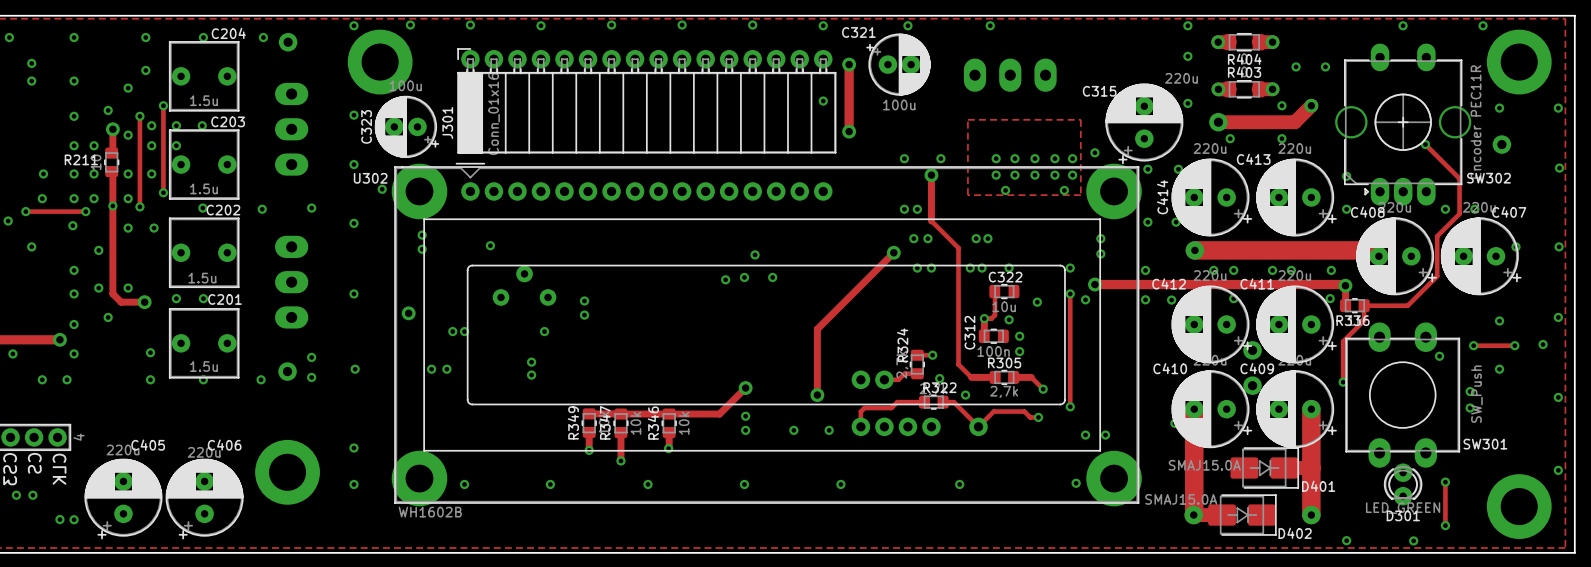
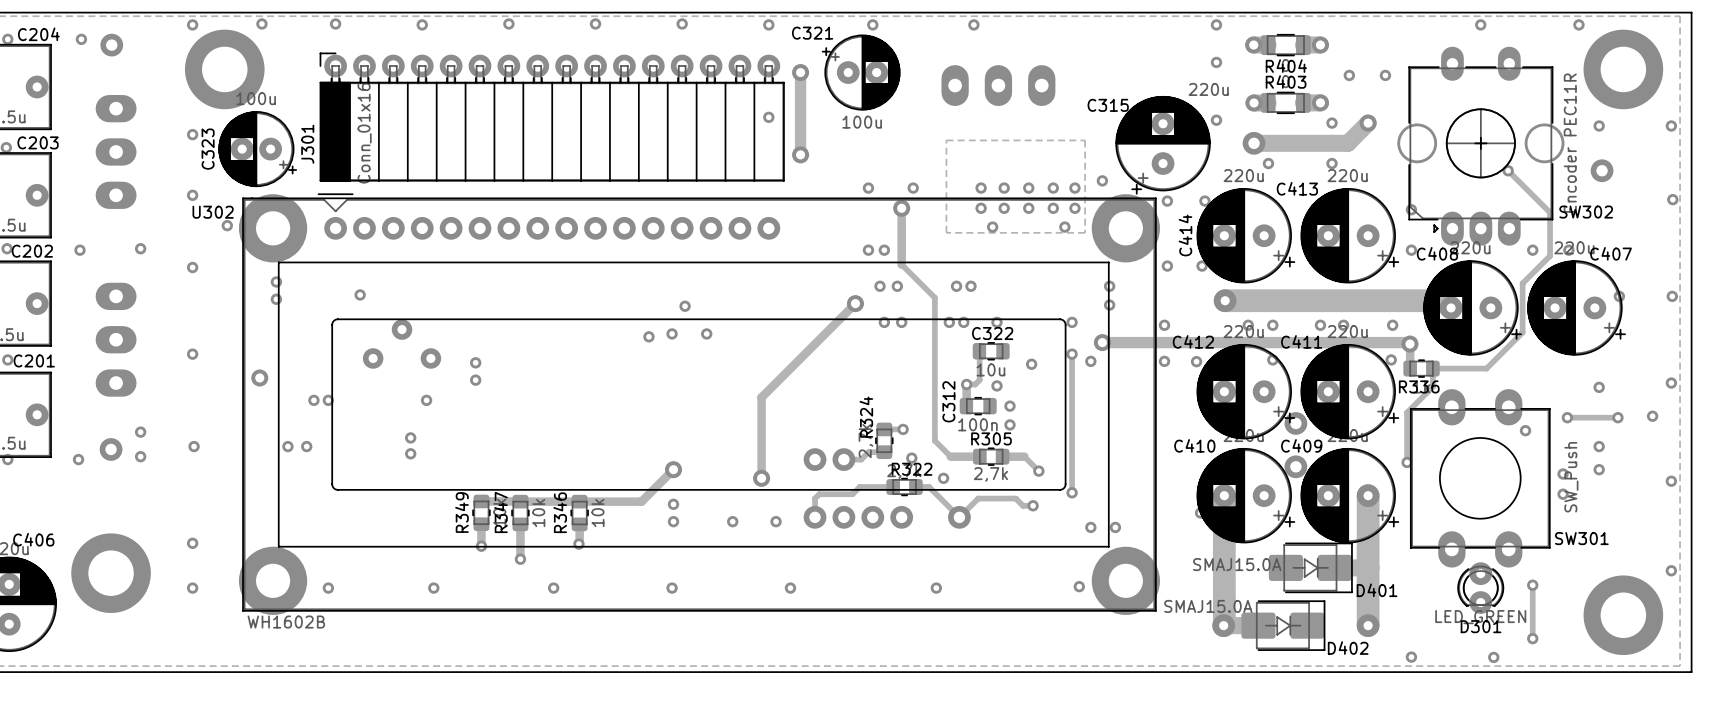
via: none -> (1599, 469)

